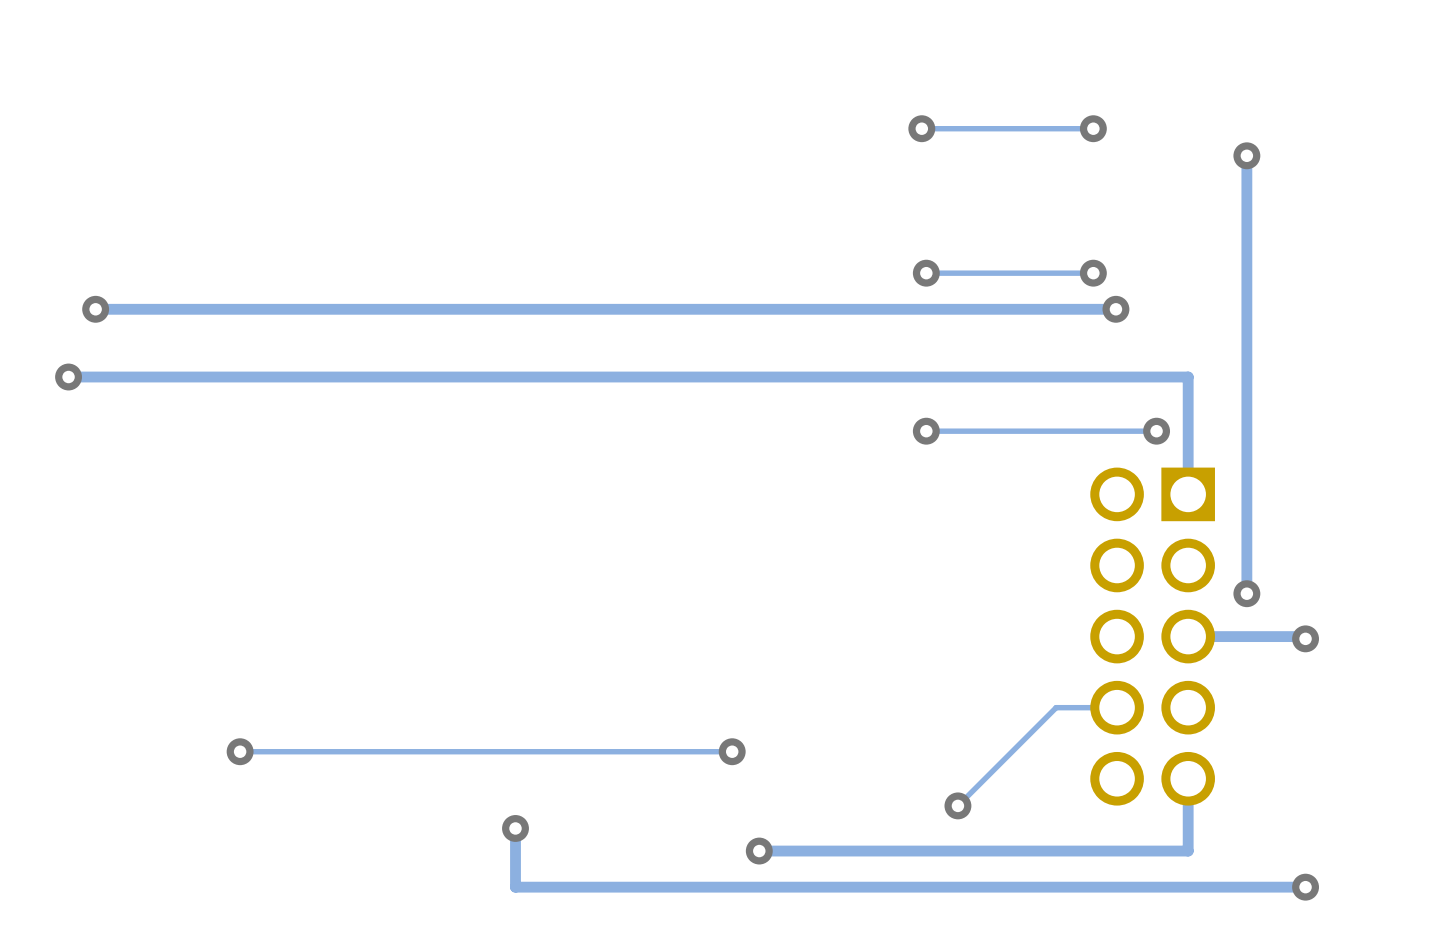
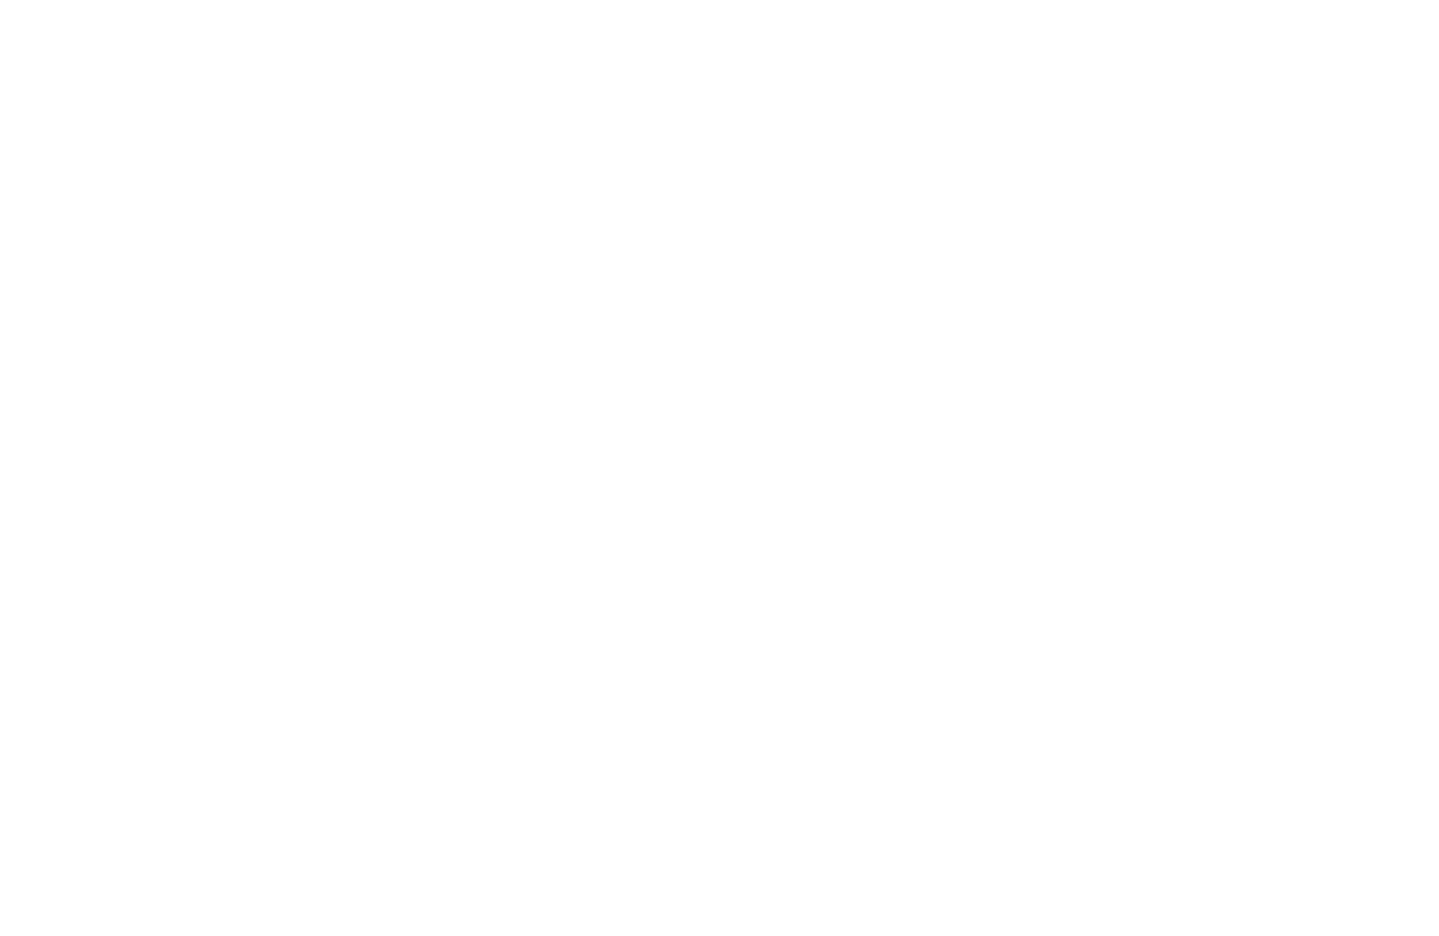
via: (921, 128) -> none
track: (1093, 128) (921, 128) -> none
via: (1093, 128) -> none
track: (1246, 155) (1246, 593) -> none
via: (1246, 155) -> none
via: (926, 273) -> none
track: (1093, 273) (926, 273) -> none
via: (1093, 273) -> none
via: (95, 309) -> none
track: (1115, 309) (95, 309) -> none
via: (1115, 309) -> none
track: (68, 377) (1188, 377) (1188, 494) -> none
via: (68, 377) -> none
via: (926, 431) -> none
track: (1156, 431) (926, 431) -> none
via: (1156, 431) -> none
via: (1246, 593) -> none
part: (1152, 636) -> none
track: (1188, 636) (1303, 636) (1305, 638) -> none
via: (1305, 638) -> none
track: (1117, 707) (1056, 707) (957, 805) -> none
via: (240, 751) -> none
track: (732, 751) (240, 751) -> none
via: (732, 751) -> none
track: (1188, 778) (1188, 851) (759, 851) -> none
via: (957, 805) -> none
track: (515, 828) (515, 887) (1305, 887) -> none
via: (515, 828) -> none
via: (759, 851) -> none
via: (1305, 887) -> none

